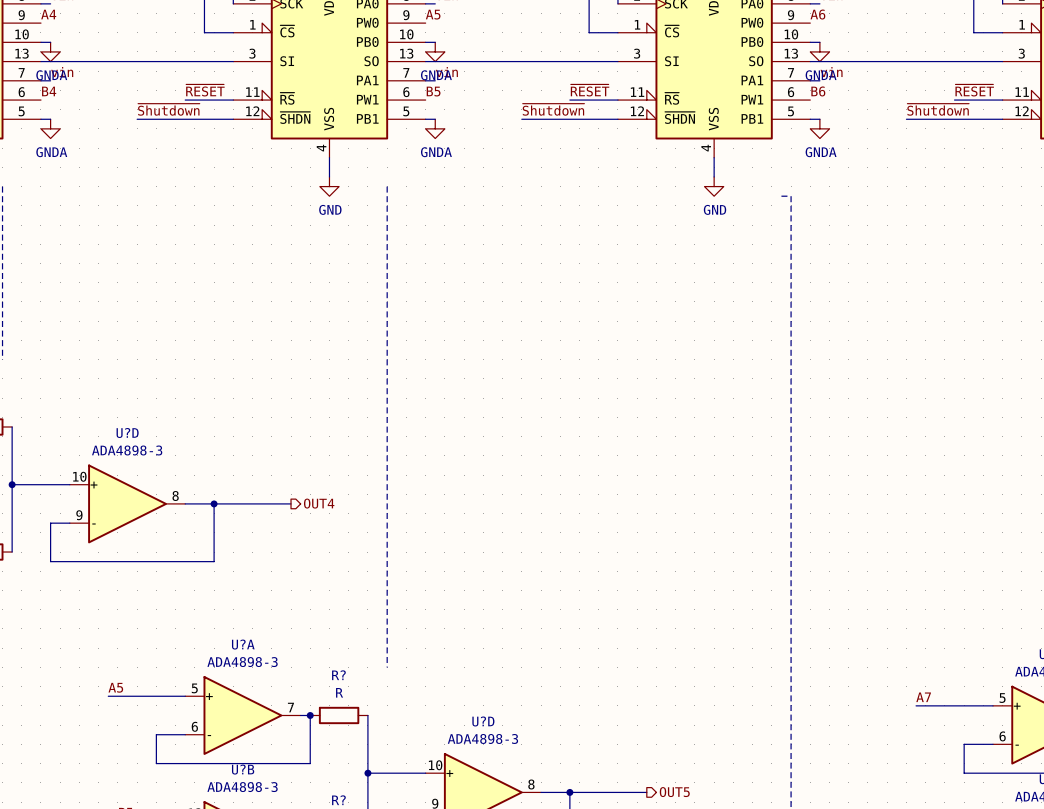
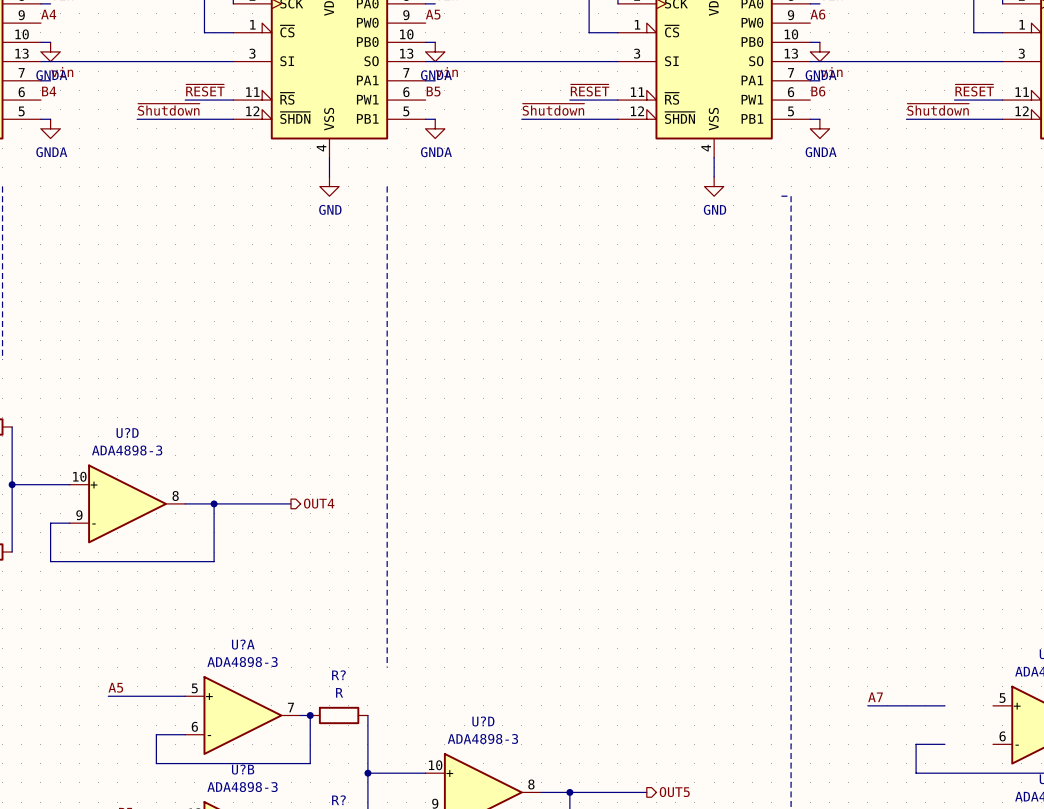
label position: A7 (923, 697) -> A7 (875, 697)
wire: (944, 705) (993, 705) -> (867, 705) (916, 705)
wire: (993, 744) (964, 744) (964, 773) -> (944, 744) (916, 744) (916, 773) (964, 773)

